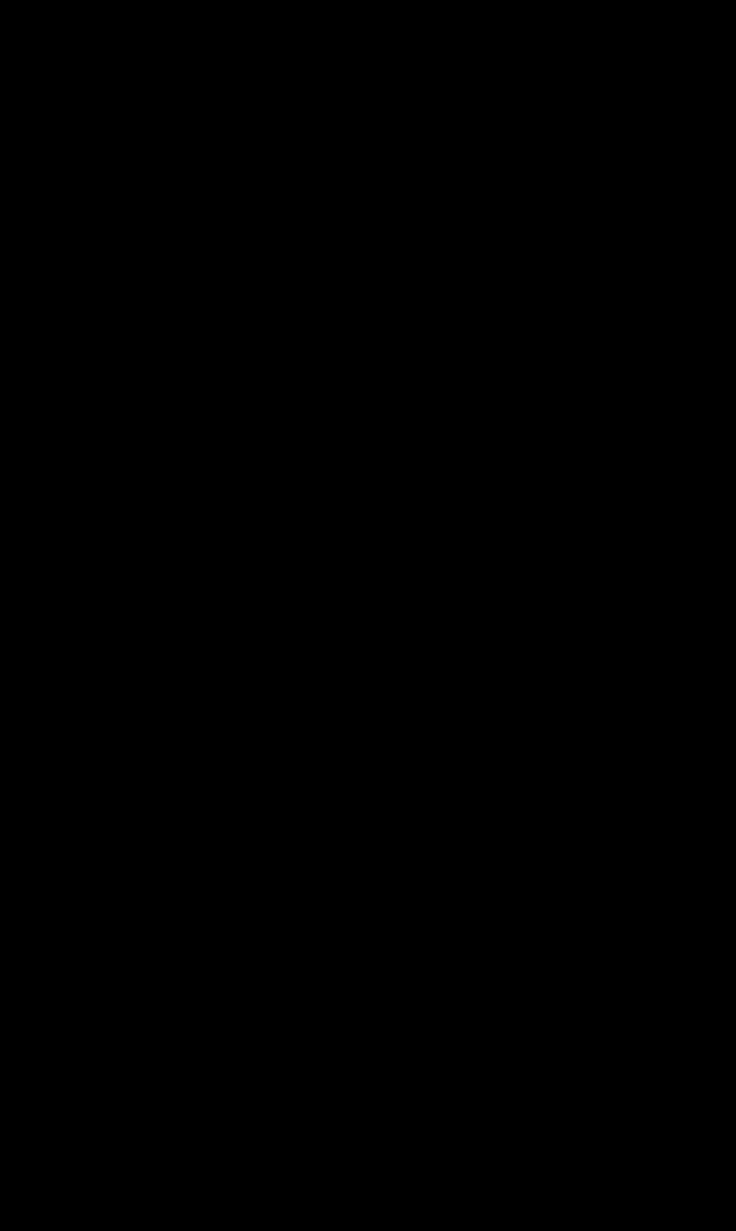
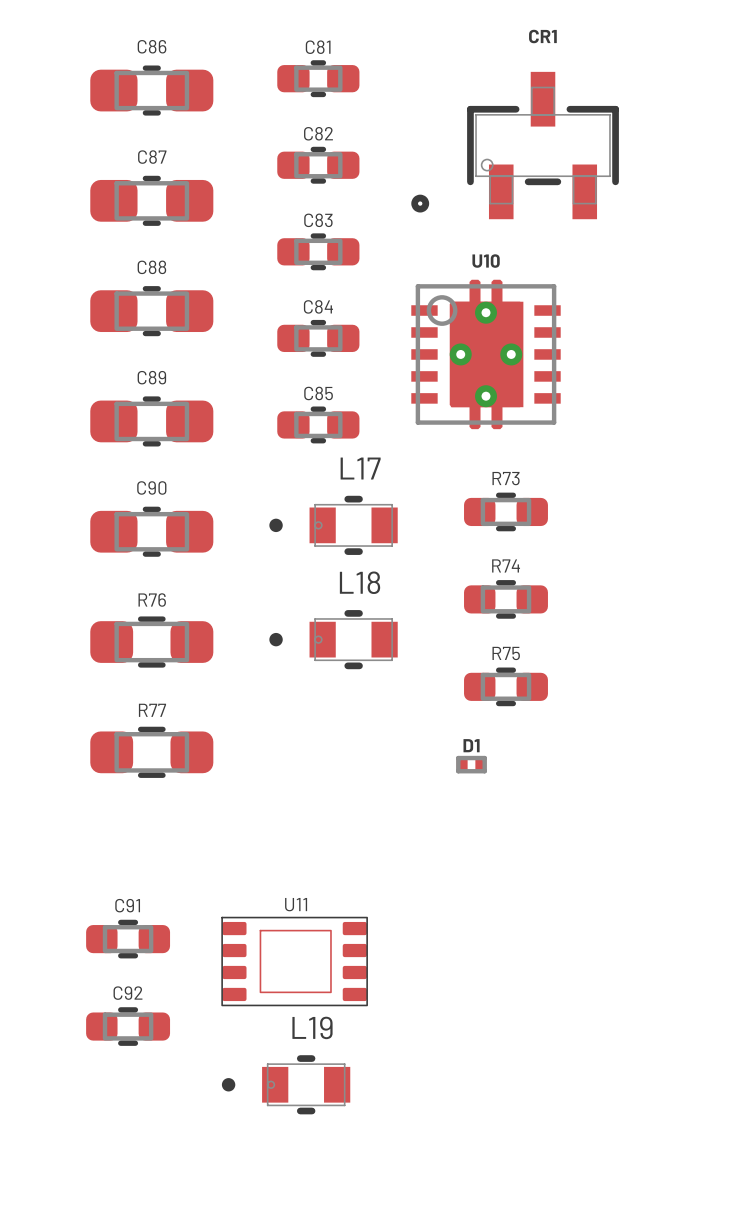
C81: none -> (318, 78)
C86: none -> (151, 90)
CR1: none -> (515, 145)
C82: none -> (318, 165)
C87: none -> (151, 200)
C83: none -> (318, 251)
C88: none -> (151, 311)
C84: none -> (318, 338)
U10: none -> (486, 354)
C89: none -> (151, 421)
C85: none -> (318, 424)
R73: none -> (505, 511)
L17: none -> (333, 525)
C90: none -> (151, 531)
R74: none -> (505, 599)
L18: none -> (333, 639)
R76: none -> (151, 642)
R75: none -> (505, 686)
R77: none -> (151, 752)
D1: none -> (471, 764)
C91: none -> (128, 939)
U11: none -> (294, 961)
C92: none -> (128, 1026)
L19: none -> (286, 1084)

